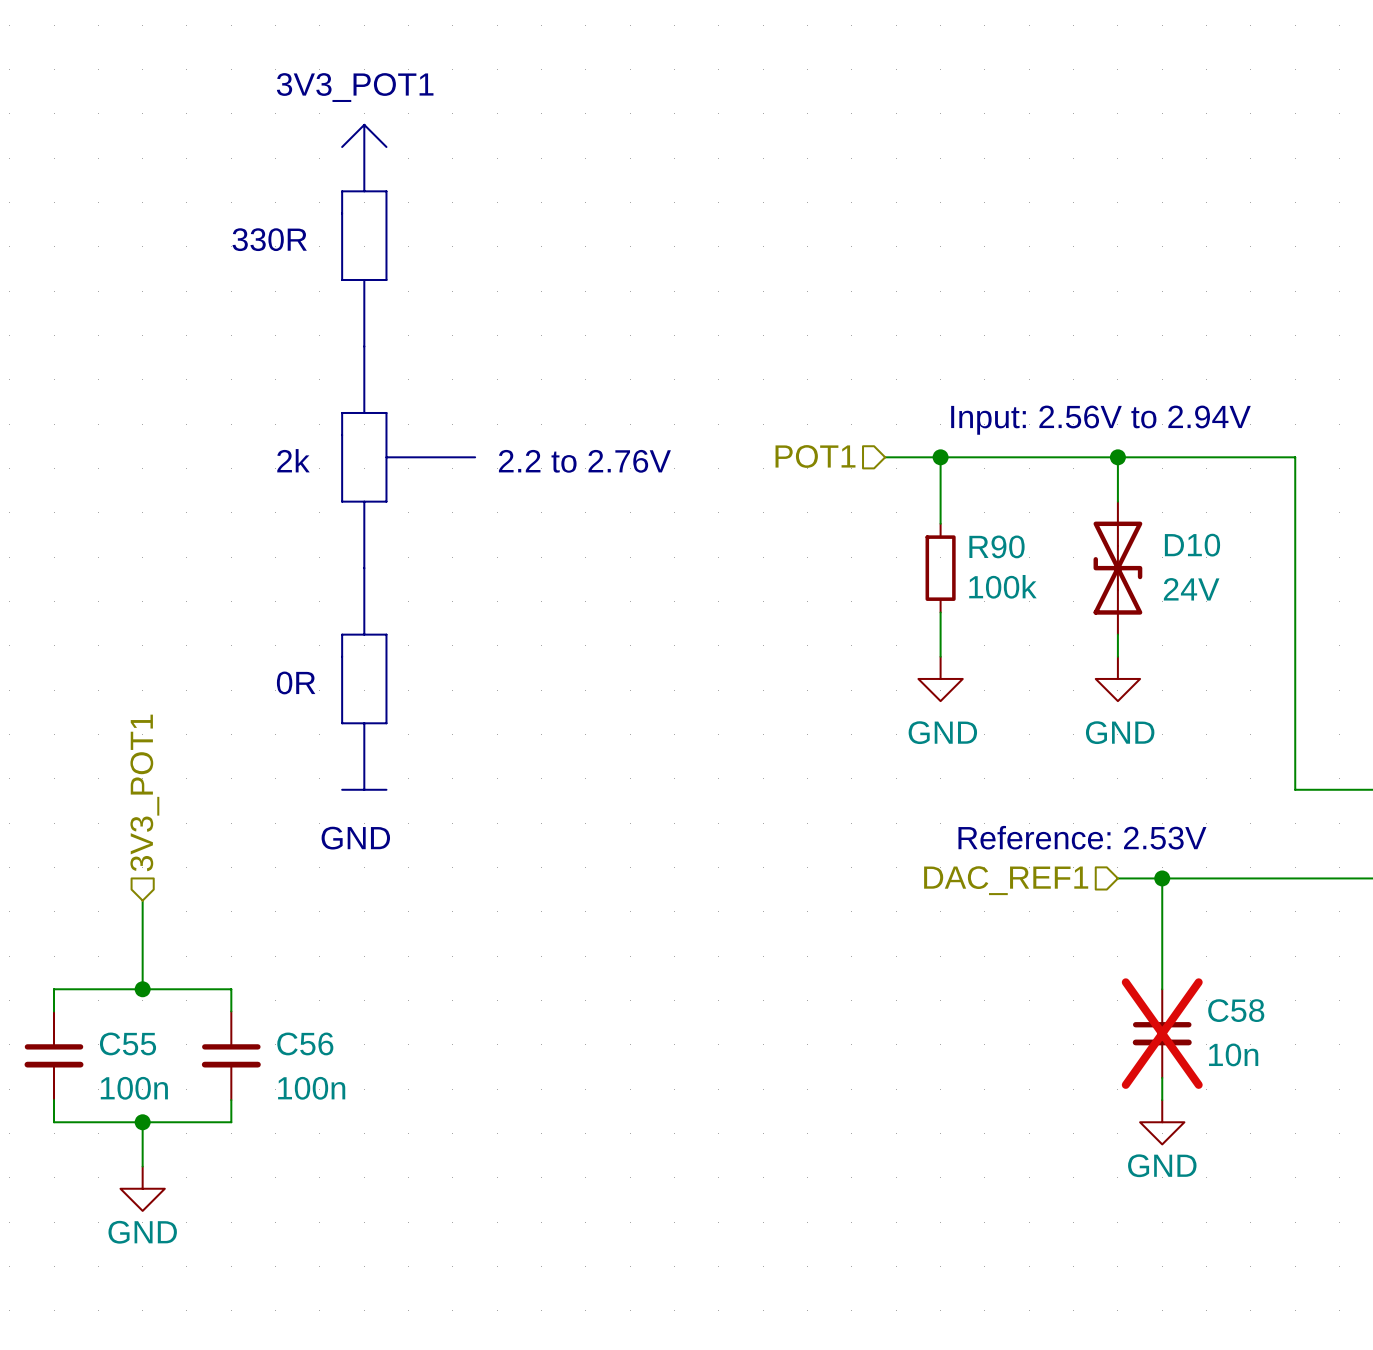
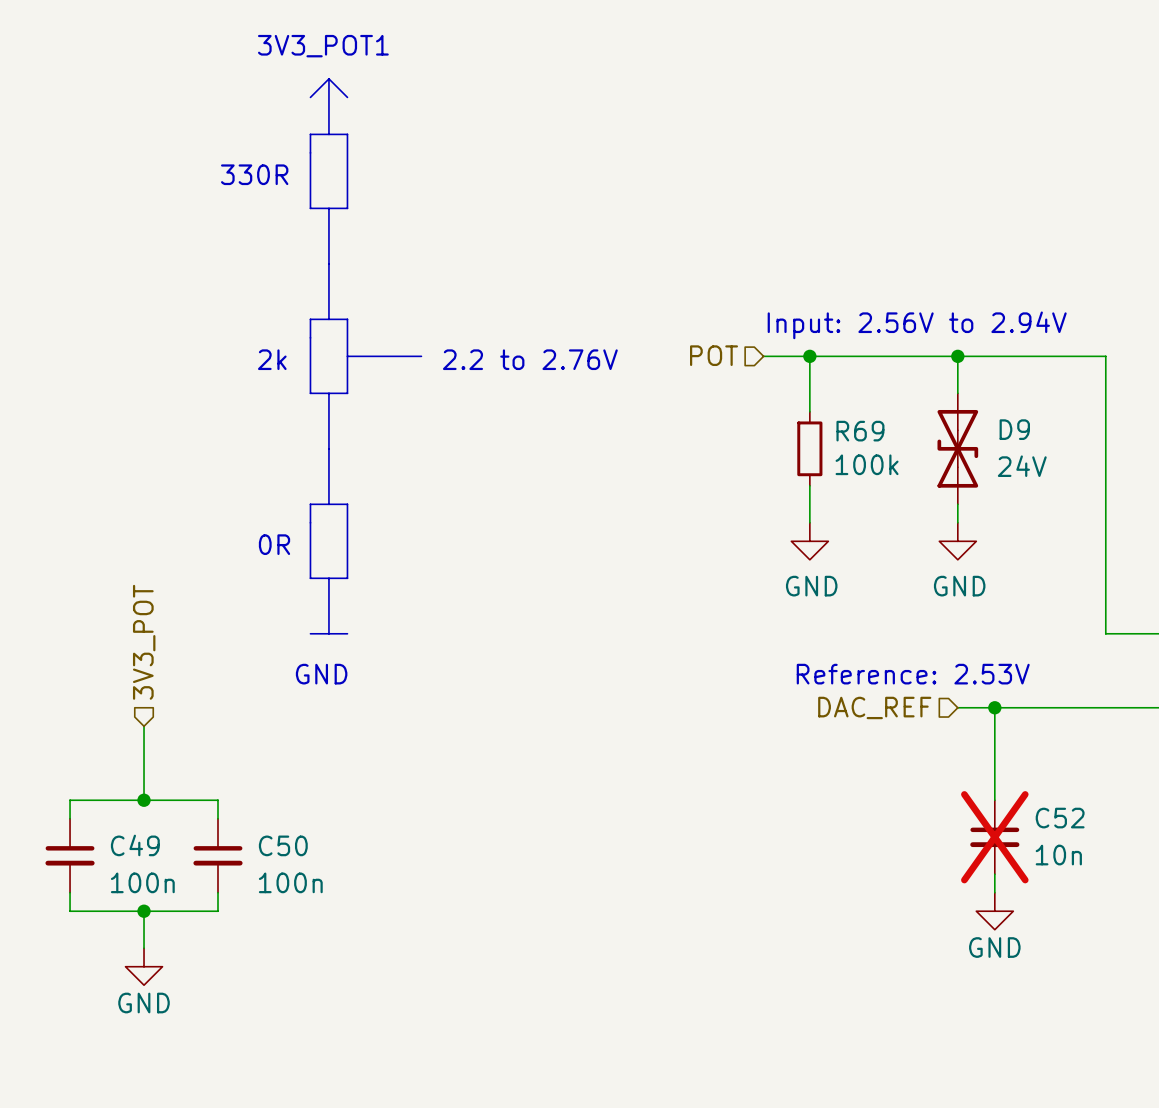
hierarchical label: POT1 (815, 456) -> POT (714, 355)
D10 name: D10 (1192, 545) -> D9 (1014, 429)
R90 name: R90 (996, 546) -> R69 (860, 431)
hierarchical label: 3V3_POT1 (144, 792) -> 3V3_POT (144, 642)
hierarchical label: DAC_REF1 (1006, 880) -> DAC_REF (874, 707)
C58 name: C58 (1236, 1010) -> C52 (1060, 818)
C55 name: C55 (128, 1043) -> C49 (135, 845)
C56 name: C56 (305, 1043) -> C50 (283, 845)

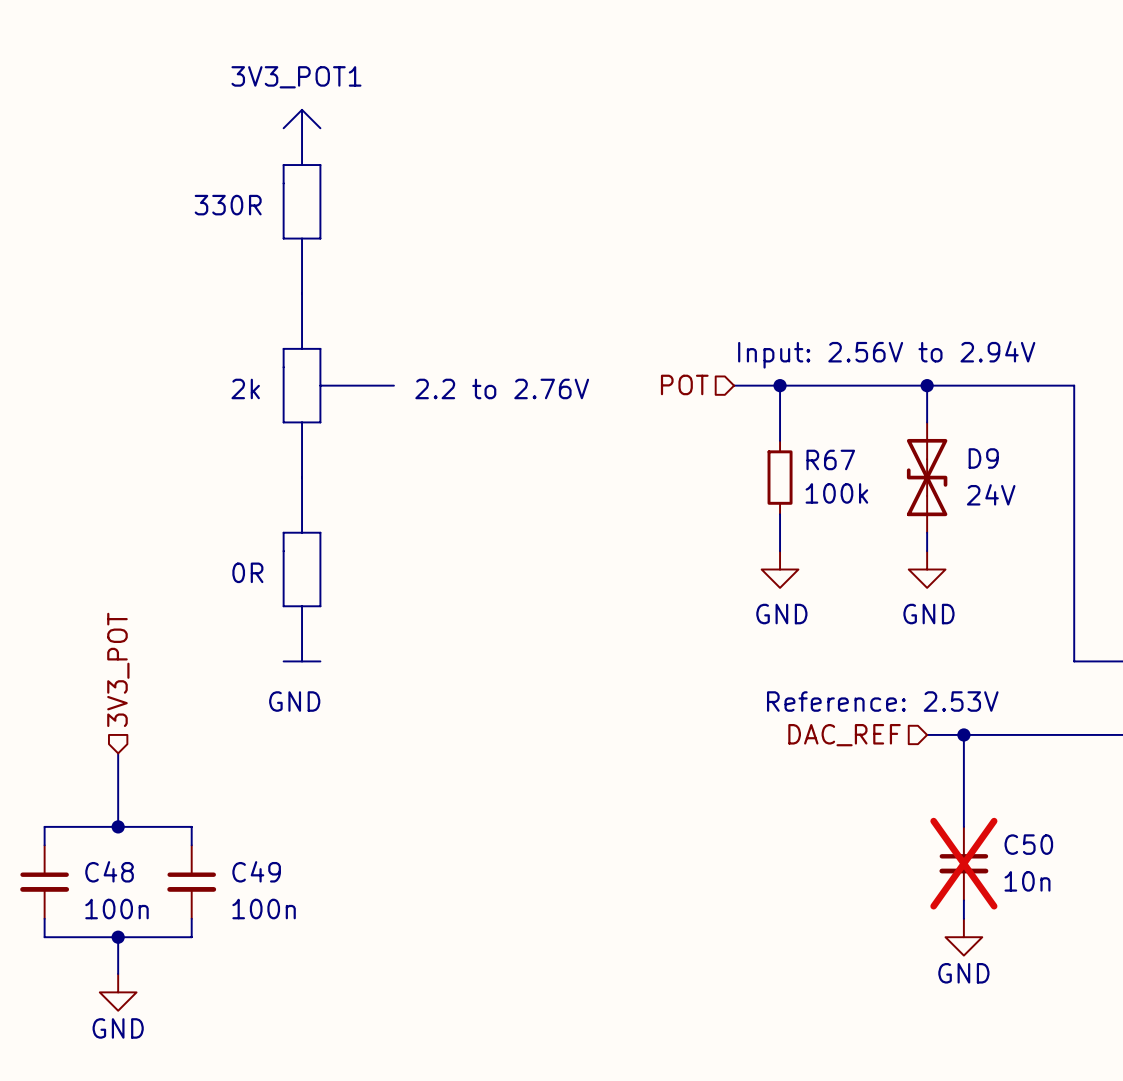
R69 name: R69 (860, 431) -> R67 (830, 459)
C52 name: C52 (1060, 818) -> C50 (1028, 844)
C49 name: C49 (135, 845) -> C48 (109, 871)
C50 name: C50 (283, 845) -> C49 (256, 871)

